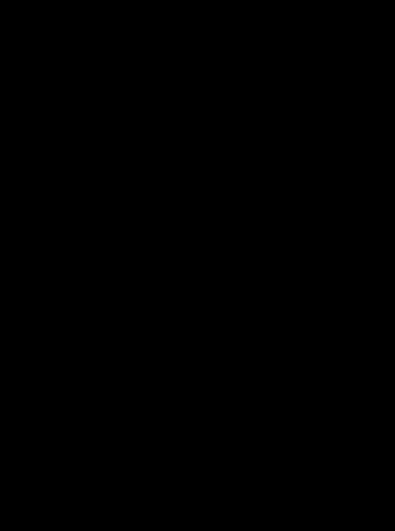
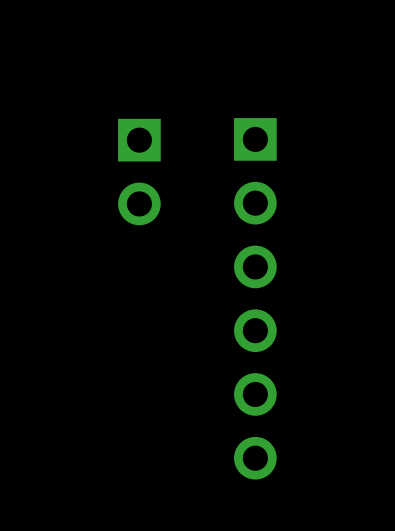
part: none -> (139, 172)
part: none -> (255, 298)

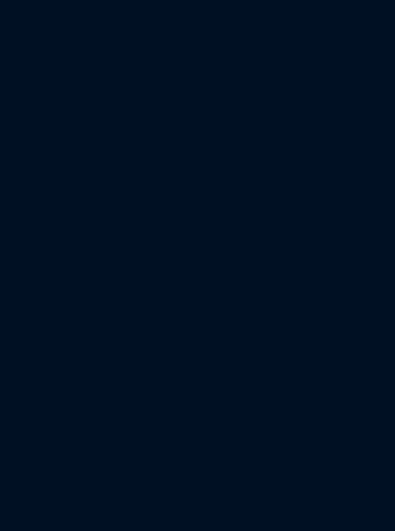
part: (139, 172) -> none
part: (255, 298) -> none

